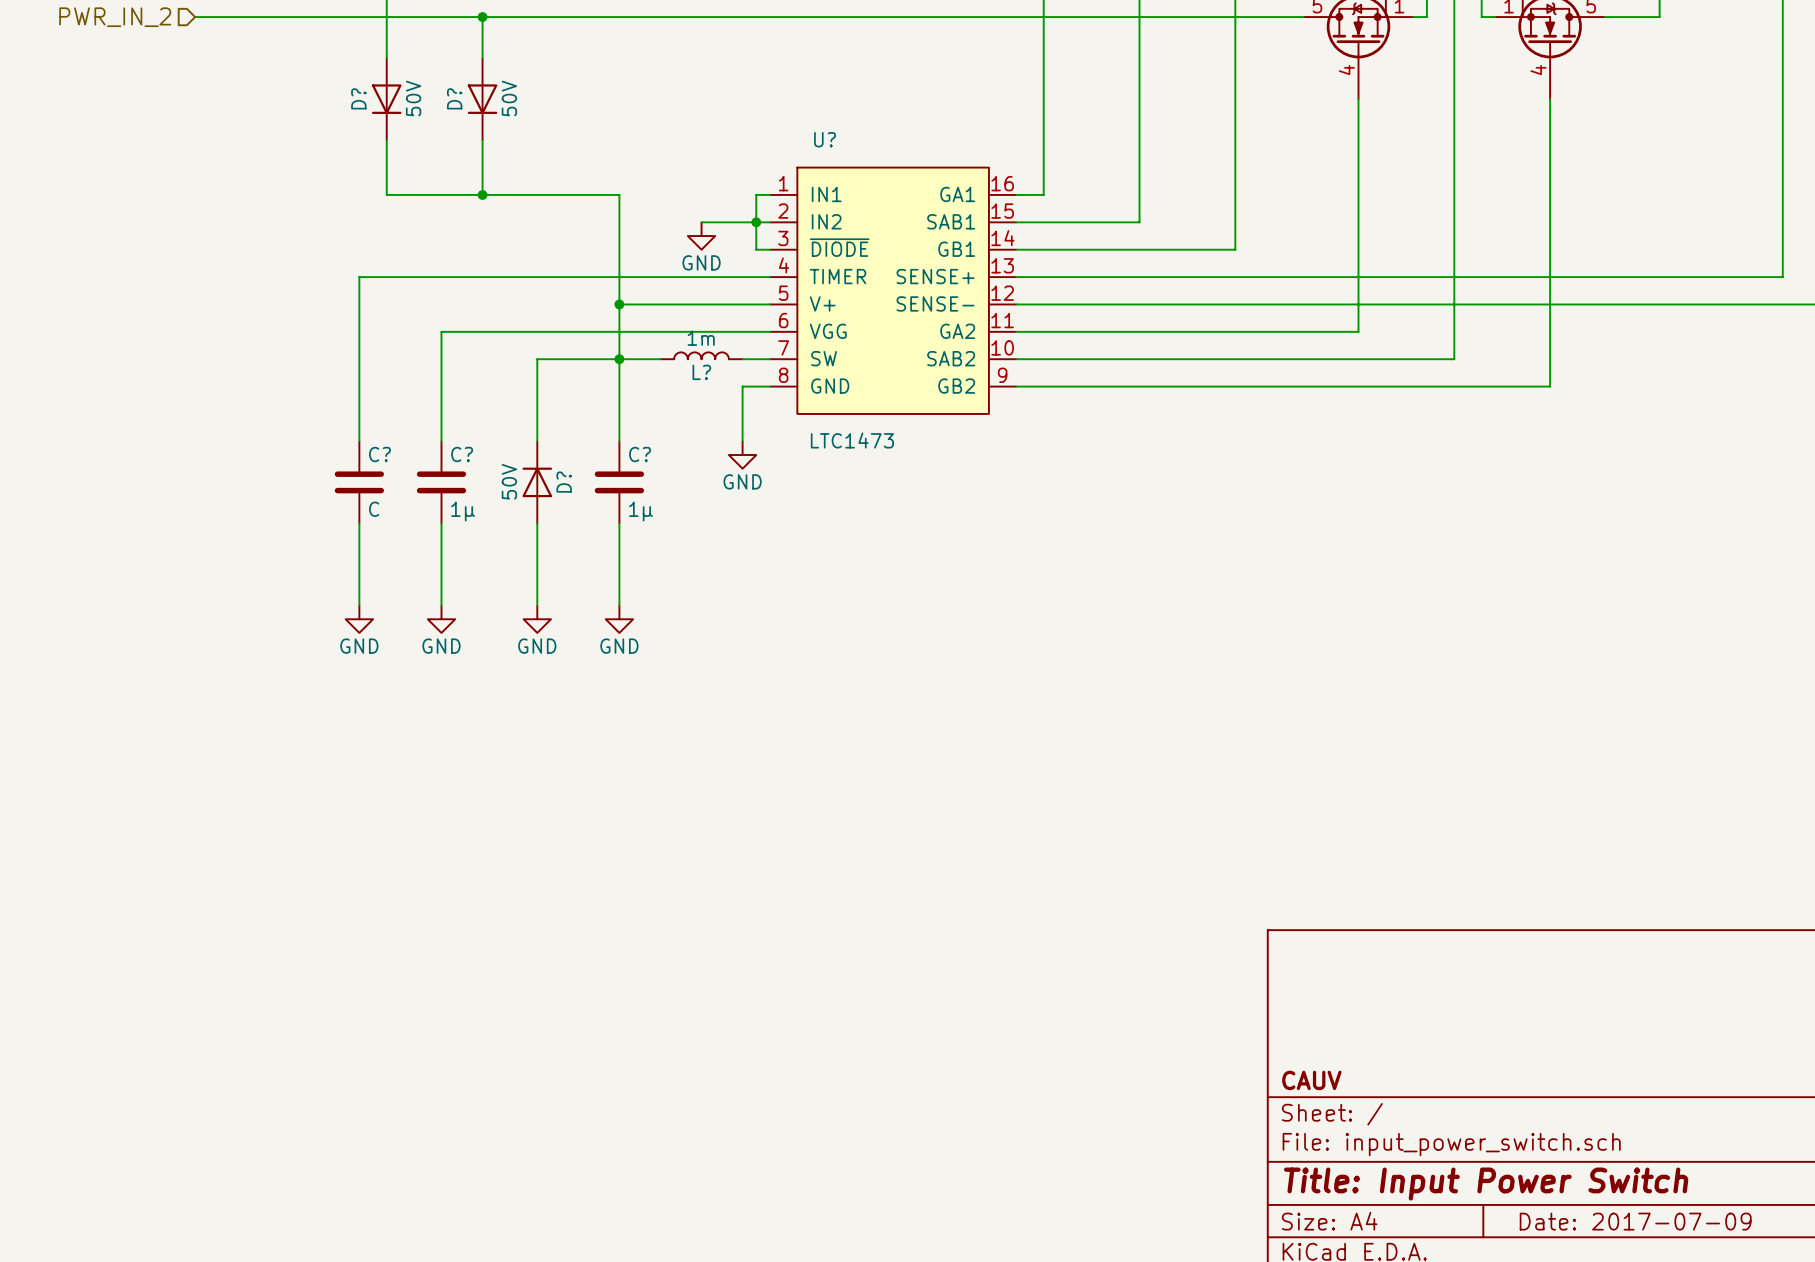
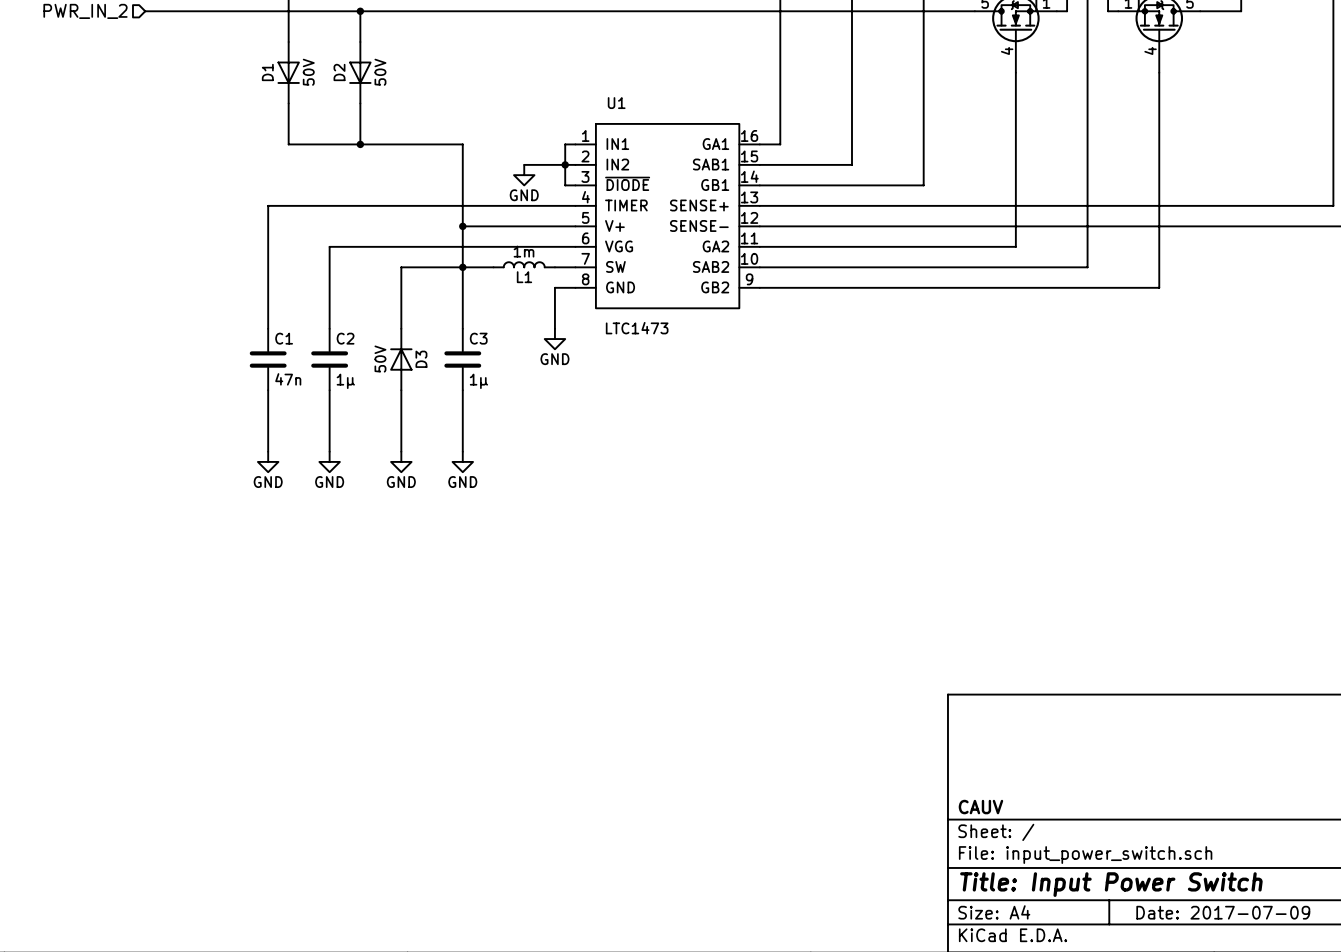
D? name: D? (358, 98) -> D1 (267, 72)
D? name: D? (454, 98) -> D2 (339, 72)
U? name: U? (825, 139) -> U1 (616, 103)
L? name: L? (701, 372) -> L1 (524, 277)
C? name: C? (379, 454) -> C1 (284, 338)
C? name: C? (462, 454) -> C2 (345, 338)
C? name: C? (640, 454) -> C3 (478, 338)
D? name: D? (564, 482) -> D3 (421, 359)
C? value: C (374, 509) -> 47n (288, 379)

